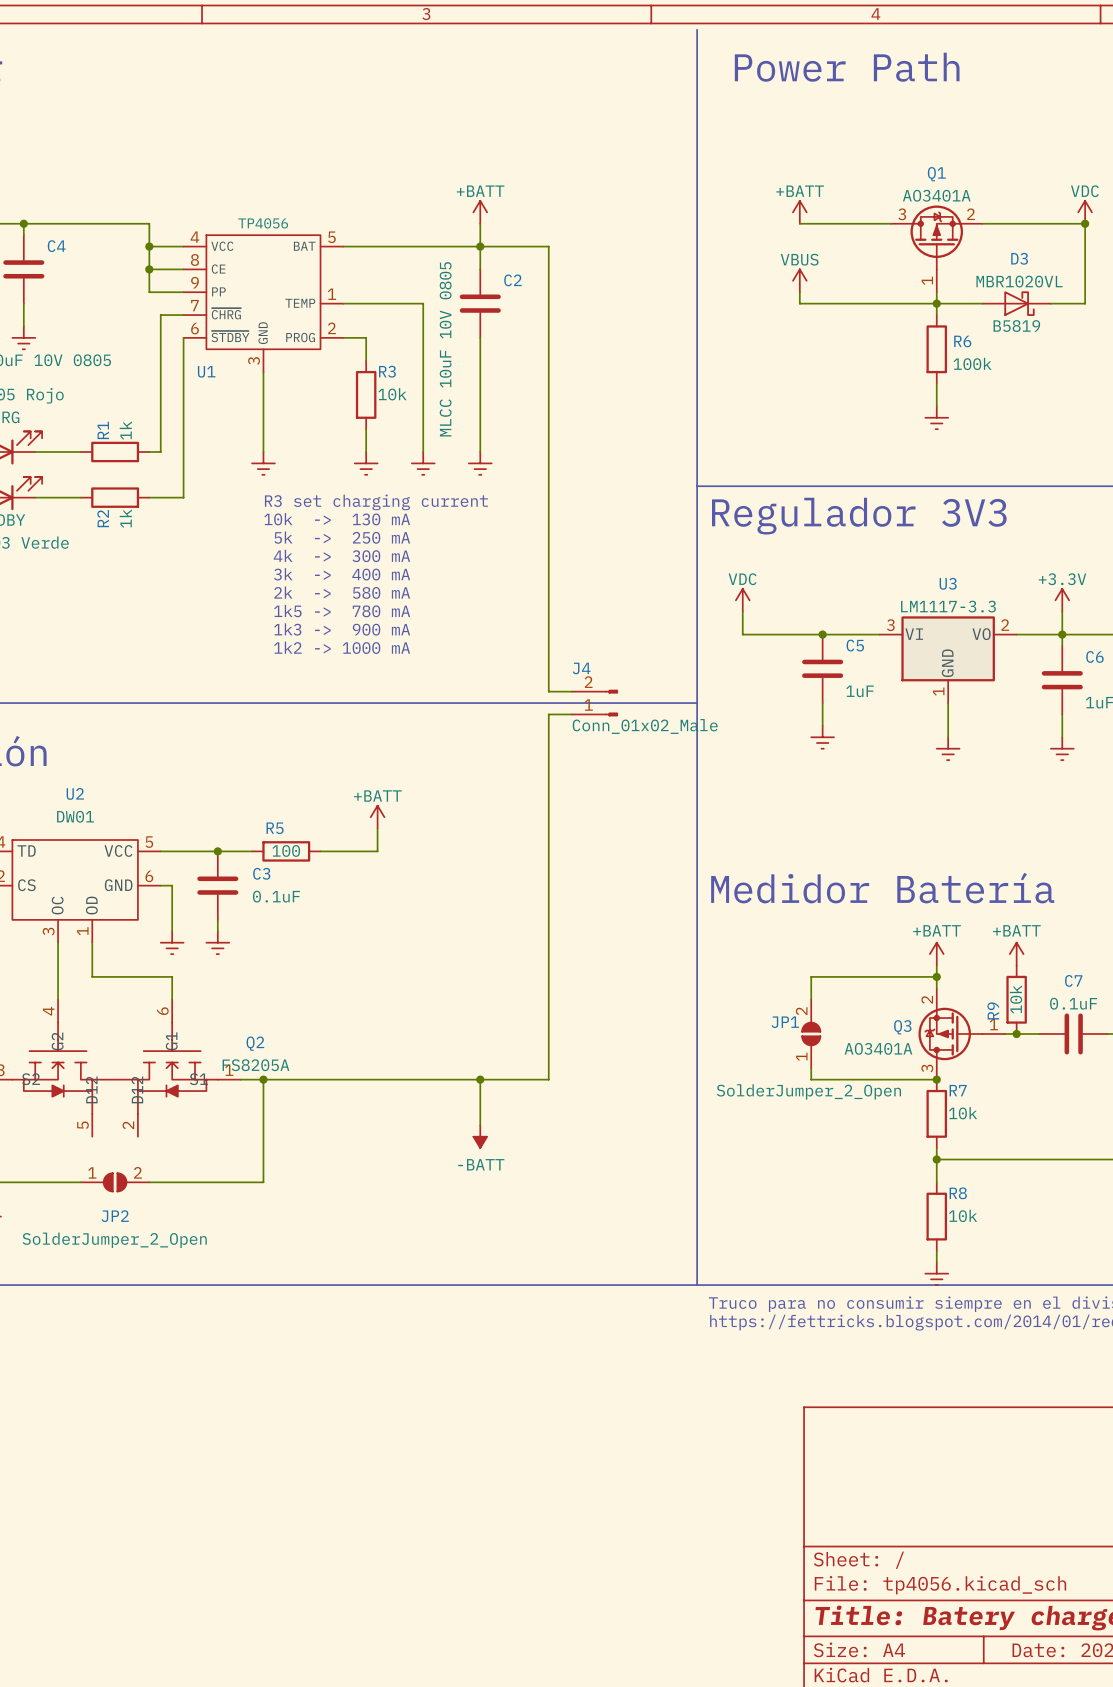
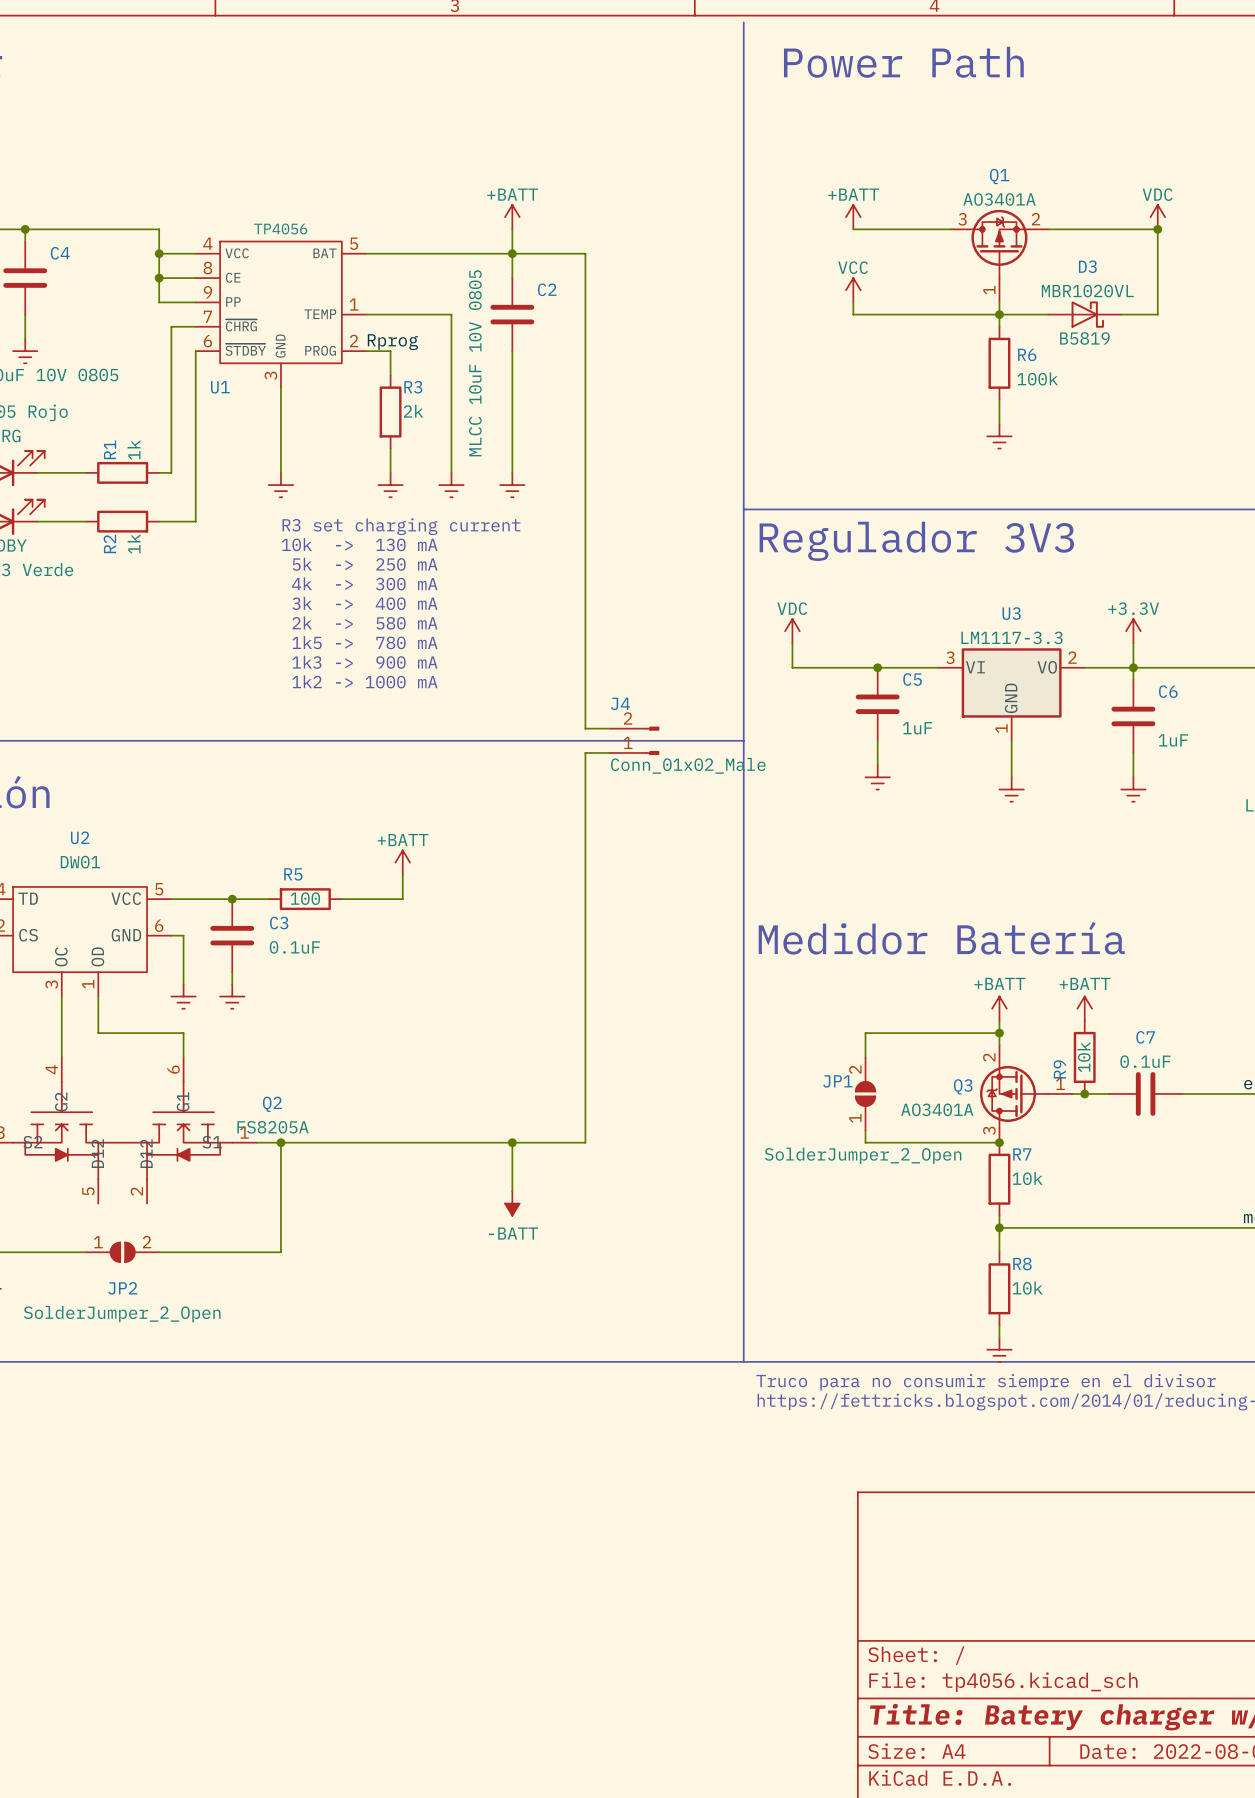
power symbol: VBUS (799, 280) -> VCC (853, 290)
label: none -> Rprog (392, 342)
R3 value: 10k (392, 394) -> 2k (413, 411)

